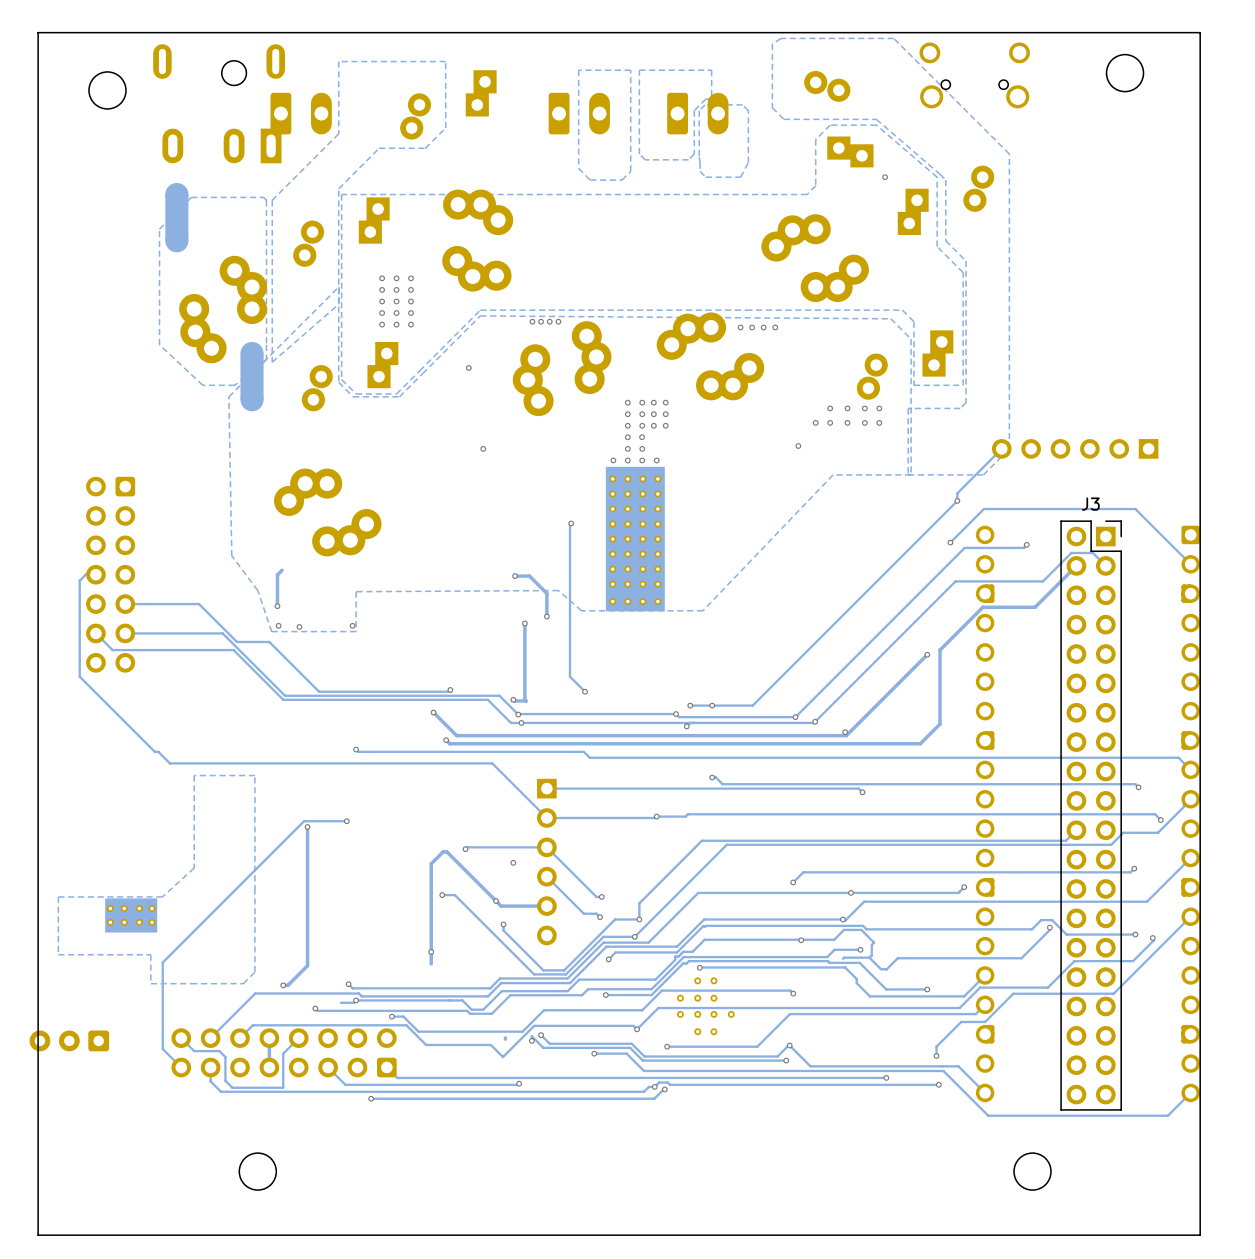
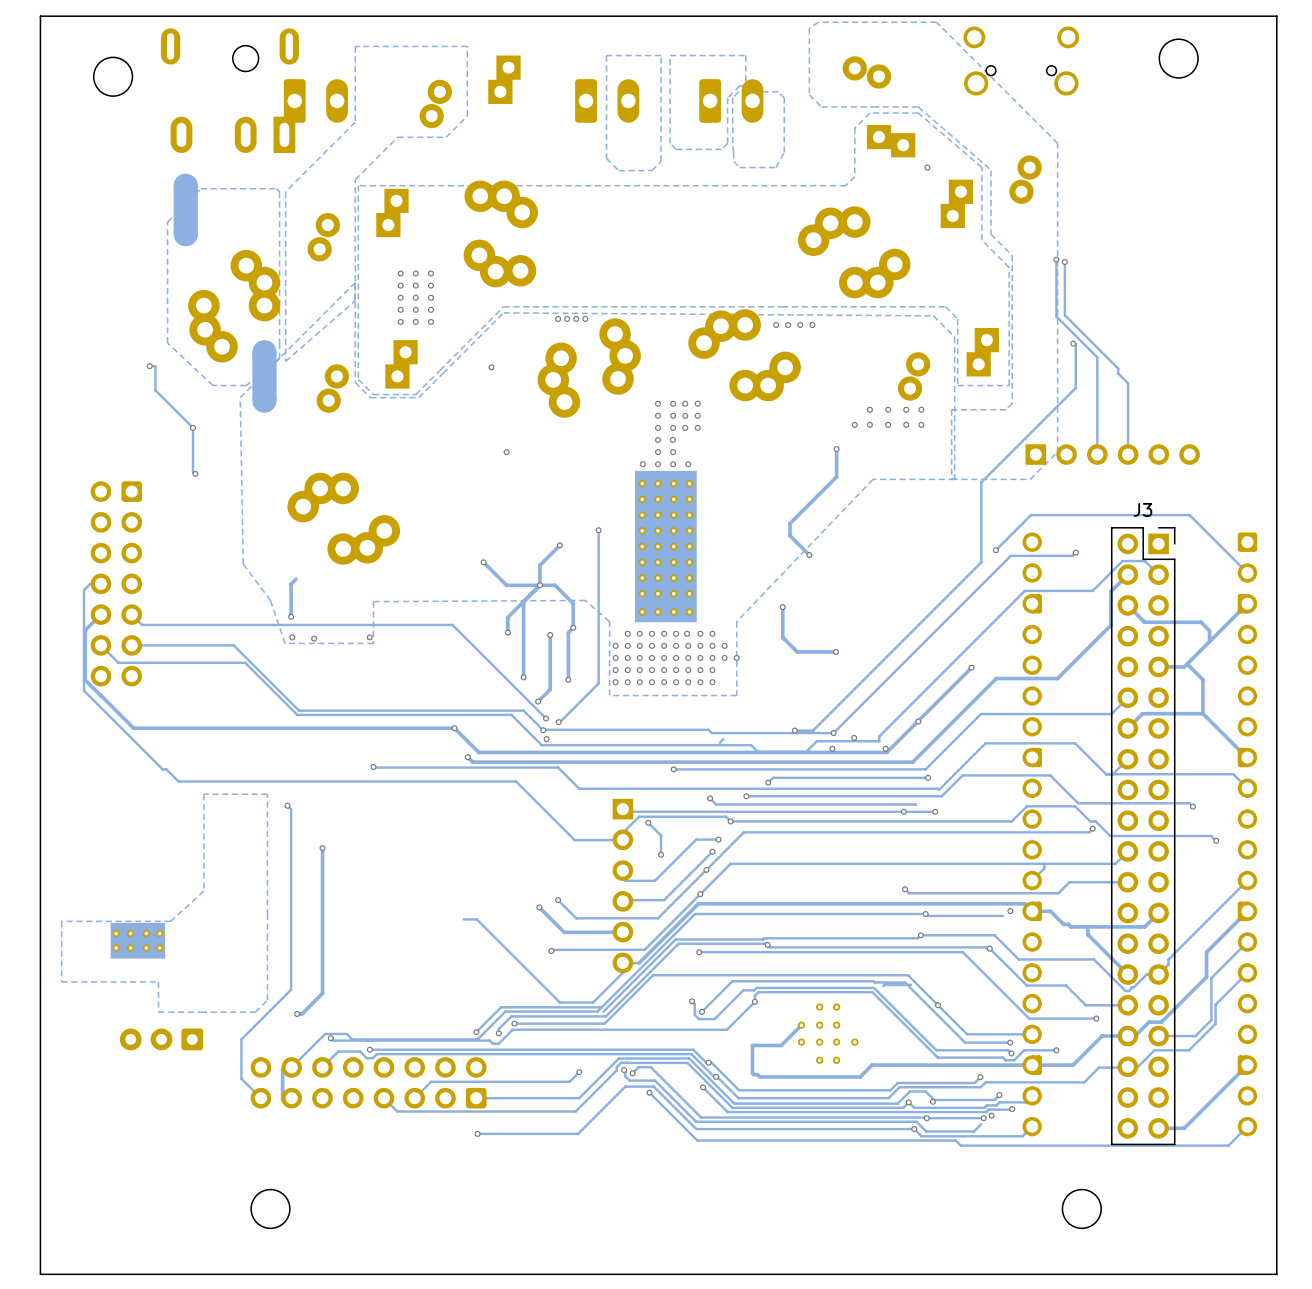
board edge: (1200, 32) (1200, 1235) (38, 1234) -> (1257, 16) (1276, 16) (1276, 1274) (40, 1274)
track: none -> (1056, 259) (1056, 316) (1097, 357) (1097, 454)
via: none -> (1056, 259)
track: none -> (1064, 262) (1064, 315) (1118, 368) (1118, 373) (1128, 383) (1128, 454)
via: none -> (1064, 262)
track: none -> (1073, 343) (1075, 344) (1075, 387) (981, 482) (981, 562) (813, 730) (794, 730)
via: none -> (1073, 343)
track: none -> (149, 366) (155, 366) (155, 390) (193, 427) (193, 471) (195, 473)
via: none -> (149, 366)
via: none -> (193, 427)
track: none -> (836, 449) (836, 476) (789, 523) (789, 535) (809, 555)
track: (1001, 448) (957, 493) (957, 500) (752, 705) (690, 705) -> none
part rotation: 0° (1075, 448) -> 180° (1112, 454)
via: none -> (195, 473)
via: (957, 500) -> none
track: (571, 523) (570, 676) (585, 691) -> (598, 530) (598, 683) (558, 722)
track: none -> (559, 545) (539, 565) (539, 585)
via: none -> (559, 545)
via: none -> (809, 555)
track: none -> (483, 562) (506, 585) (539, 585)
via: none -> (483, 562)
track: none -> (539, 585) (507, 617) (507, 632)
track: (978, 581) (955, 581) (813, 722) (511, 722) -> (1024, 590) (879, 736) (879, 741) (816, 741) (806, 751) (757, 751) (751, 745) (541, 745) (535, 739)
track: (1060, 582) (1035, 607) (982, 607) (940, 650) (940, 724) (920, 743) (449, 743) -> (1110, 591) (1110, 625) (1057, 678) (996, 678) (912, 762) (471, 760)
track: none -> (523, 601) (523, 677)
track: none -> (1247, 603) (1184, 666) (1158, 666)
track: none -> (1127, 605) (1144, 622) (1201, 622) (1209, 630) (1209, 641)
track: none -> (782, 607) (782, 637) (797, 651) (836, 651)
via: none -> (782, 607)
track: none -> (100, 614) (85, 630) (85, 680) (133, 728) (454, 728)
track: (125, 604) (199, 604) (236, 642) (269, 642) (319, 691) (450, 691) (450, 689) -> (131, 614) (142, 624) (452, 624) (545, 718)
zone outline: (702, 610) (581, 610) -> (736, 621) (736, 695) (609, 695) (609, 621)
track: none -> (573, 627) (568, 632) (568, 679)
via: none -> (507, 632)
via: none -> (627, 633)
via: none -> (639, 633)
via: none -> (651, 633)
via: none -> (664, 633)
via: none -> (676, 633)
via: none -> (687, 633)
via: none -> (700, 633)
via: none -> (712, 633)
via: none -> (615, 645)
via: none -> (627, 645)
via: none -> (639, 645)
via: none -> (651, 645)
via: none -> (664, 645)
via: none -> (676, 645)
via: none -> (688, 645)
via: none -> (700, 645)
via: none -> (712, 645)
via: none -> (724, 645)
via: none -> (836, 651)
via: none -> (615, 657)
via: none -> (627, 657)
via: none -> (639, 657)
via: none -> (651, 657)
via: none -> (664, 657)
via: none -> (676, 657)
via: none -> (688, 657)
via: none -> (700, 657)
via: none -> (712, 657)
via: none -> (724, 657)
via: none -> (736, 657)
track: none -> (1187, 664) (1202, 679) (1202, 713)
via: none -> (615, 670)
via: none -> (627, 670)
via: none -> (639, 670)
via: none -> (651, 670)
via: none -> (664, 670)
via: none -> (676, 670)
via: none -> (688, 670)
via: none -> (700, 670)
via: none -> (712, 670)
via: none -> (523, 677)
via: none -> (568, 679)
via: none -> (615, 682)
via: none -> (627, 682)
via: none -> (639, 682)
via: none -> (651, 682)
via: none -> (664, 682)
via: none -> (676, 682)
via: none -> (688, 682)
via: none -> (700, 682)
via: none -> (712, 682)
track: (524, 675) (526, 700) (513, 699) -> (550, 689) (538, 701)
track: none -> (1127, 697) (1111, 714) (980, 714) (925, 769) (673, 769)
via: none -> (538, 701)
via: (450, 689) -> none
via: (585, 691) -> none
track: none -> (1202, 713) (1247, 757)
track: none -> (1202, 713) (1142, 713) (1127, 728)
via: (513, 699) -> none
via: none -> (545, 718)
via: (690, 705) -> none
via: (712, 705) -> none
via: none -> (558, 722)
via: none -> (918, 721)
via: (676, 714) -> none
via: none -> (794, 730)
via: (686, 726) -> none
via: none -> (832, 748)
track: none -> (1127, 759) (1112, 774)
track: (356, 750) (358, 751) (583, 751) (589, 757) (1178, 757) -> (374, 767) (558, 767) (579, 788) (938, 789) (985, 743) (1075, 743) (1106, 774) (1234, 775)
via: none -> (673, 769)
track: none -> (928, 777) (773, 777) (768, 782)
via: none -> (928, 777)
via: none -> (768, 782)
track: (715, 777) (722, 784) (1029, 784) -> (750, 796) (941, 796) (962, 775) (1050, 775) (1078, 803)
track: none -> (710, 798) (716, 804) (915, 804)
via: none -> (710, 798)
track: none -> (287, 805) (291, 809) (291, 989) (241, 1039) (241, 1078) (260, 1098)
via: none -> (287, 805)
track: (546, 788) (858, 788) (862, 792) -> none
track: none -> (935, 811) (618, 811)
via: none -> (935, 811)
via: none -> (730, 821)
track: none -> (648, 822) (661, 835) (661, 854)
via: none -> (648, 822)
track: (1183, 802) (1183, 806) (1157, 832) (1123, 832) (1111, 844) (726, 844) (634, 936) (609, 936) -> (1139, 926) (1071, 926) (1068, 924) (1063, 924) (1050, 911) (1032, 911) (1024, 903) (698, 903) (639, 963)
track: none -> (1092, 828) (1089, 832) (743, 832) (658, 918) (576, 918) (558, 900)
via: none -> (1092, 828)
track: (1156, 815) (687, 814) (685, 816) (655, 817) (546, 817) -> (1211, 835) (1110, 835) (1095, 821) (1090, 821) (1075, 806) (1026, 806) (1011, 821) (730, 821) (725, 816) (638, 816) (615, 840) (573, 838)
via: (656, 816) -> none
track: none -> (718, 839) (696, 839) (654, 880) (625, 880) (615, 870)
via: none -> (718, 839)
track: (346, 821) (304, 821) (162, 962) (162, 1049) (181, 1067) -> none
via: (346, 821) -> none
track: none -> (712, 851) (664, 900) (617, 900)
via: none -> (712, 851)
via: none -> (661, 854)
track: (1065, 840) (701, 840) (639, 903) (639, 919) (615, 919) (564, 970) (543, 970) (503, 930) (503, 924) -> (1116, 862) (730, 863) (644, 949) (551, 951)
track: none -> (1044, 863) (1044, 868) (1032, 880)
via: none -> (706, 869)
track: (465, 849) (467, 847) (546, 847) (596, 896) (601, 896) -> none
via: (465, 849) -> none
track: none -> (1127, 882) (1069, 882) (1058, 893) (909, 893) (905, 889)
via: (513, 862) -> none
part position: (546, 862) -> (622, 886)
via: none -> (905, 889)
track: (1134, 868) (1130, 872) (803, 872) (793, 882) -> none
via: (1134, 868) -> none
via: none -> (700, 894)
via: none -> (558, 900)
track: (546, 876) (583, 913) (596, 913) (600, 917) -> none
via: (793, 882) -> none
track: none -> (539, 907) (564, 932) (615, 932)
via: none -> (539, 907)
track: (964, 887) (958, 892) (698, 892) (648, 942) (603, 942) (567, 978) (500, 978) (490, 988) (352, 988) (348, 984) -> none
track: none -> (1247, 911) (1206, 952) (1206, 977) (1161, 1022) (1149, 1022) (1135, 1036) (1102, 1036) (1073, 1065) (872, 1065) (860, 1076) (759, 1076) (753, 1074) (752, 1045) (781, 1045) (801, 1025)
track: none -> (1158, 913) (1144, 926) (1139, 926)
via: none -> (925, 914)
track: none -> (1003, 915) (695, 914) (635, 973)
via: (850, 892) -> none
via: (442, 895) -> none
via: (601, 896) -> none
via: (496, 901) -> none
track: (1146, 901) (864, 901) (845, 920) (704, 919) (677, 946) (606, 946) -> (1201, 926) (1168, 959) (1168, 964) (1158, 974) (1146, 974) (1129, 990) (1125, 990) (1093, 959) (1018, 959) (994, 935) (920, 935) (917, 938) (675, 939) (607, 1007)
track: none -> (1087, 926) (1087, 934) (1127, 974)
track: (546, 906) (501, 906) (446, 851) (443, 851) (431, 863) (431, 963) -> none
via: none -> (920, 935)
via: (600, 917) -> none
via: (639, 919) -> none
via: none -> (767, 944)
via: (842, 919) -> none
via: none -> (989, 948)
via: (503, 924) -> none
track: none -> (988, 949) (989, 948) (1000, 959)
track: none -> (988, 950) (985, 947) (770, 947) (766, 943) (678, 943) (605, 1016) (511, 1016) (498, 1029) (498, 1033)
via: none -> (551, 951)
via: none -> (699, 952)
track: (702, 926) (676, 952) (615, 952) (608, 959) -> (736, 952) (699, 952)
track: (705, 926) (863, 925) (866, 929) (1031, 929) (1041, 920) (1052, 920) (1066, 934) (1135, 934) -> (739, 952) (962, 952) (1029, 1018) (1096, 1018)
track: (1049, 927) (1049, 929) (1021, 958) (1017, 958) -> (1127, 1005) (1085, 1005) (1066, 985)
via: (1049, 927) -> none
via: (1135, 934) -> none
via: (634, 936) -> none
track: (1152, 938) (1153, 940) (1133, 961) (1074, 961) (1047, 987) (980, 987) (959, 1008) (658, 1008) (637, 1029) (633, 1025) (534, 1025) (503, 1057) (490, 1044) (426, 1044) (406, 1025) (252, 1025) (240, 1038) -> none
via: (1152, 938) -> none
via: (801, 940) -> none
track: none -> (1247, 972) (1215, 1004) (1215, 1023) (1188, 1050) (1154, 1050) (1138, 1066) (1098, 1067) (1084, 1082) (985, 1082) (980, 1087) (899, 1087) (888, 1098) (738, 1098) (691, 1054) (376, 1054) (372, 1058) (366, 1058) (360, 1051) (338, 1051) (322, 1067)
track: (860, 949) (834, 949) (827, 957) (683, 957) (651, 989) (588, 989) (582, 995) (510, 995) (491, 1013) (475, 1013) -> (1056, 1050) (1024, 1050) (1014, 1060) (1005, 1060) (1003, 1057) (937, 1057) (872, 992) (758, 992) (754, 995) (754, 1001) (727, 1029) (512, 1029) (498, 1043)
via: (860, 949) -> none
via: (431, 951) -> none
track: (1156, 951) (1113, 993) (1013, 993) (985, 1021) (961, 1021) (936, 1046) (936, 1055) -> (1211, 978) (1211, 1020) (1195, 1036) (1158, 1036)
track: (980, 958) (897, 958) (886, 969) (881, 969) (869, 957) (871, 955) (871, 944) (874, 942) (861, 929) (844, 929) (834, 939) (704, 939) (692, 951) (683, 951) (678, 956) (675, 956) (675, 959) (655, 979) (579, 979) -> (1026, 985) (1000, 959)
via: (608, 959) -> none
track: (699, 967) (845, 967) (856, 979) (856, 983) -> (692, 1001) (694, 1003) (694, 1014) (698, 1019) (714, 1019) (743, 990) (754, 990) (756, 987) (874, 987) (897, 1011)
via: (699, 967) -> none
via: none -> (692, 1001)
via: none -> (754, 1001)
track: (985, 975) (964, 996) (870, 996) -> (1011, 1053) (1008, 1050) (936, 1050) (911, 1025)
via: none -> (938, 1005)
track: none -> (601, 1007) (501, 1007) (476, 1032)
track: (501, 983) (487, 996) (361, 996) (358, 993) (255, 993) (210, 1038) -> (525, 1011) (505, 1011) (477, 1039) (352, 1039) (346, 1033) (325, 1033) (291, 1067)
track: (575, 983) (567, 991) (501, 991) (483, 1009) (471, 1009) (462, 1000) (356, 1000) (353, 1002) (341, 1002) -> none
track: none -> (702, 1011) (732, 981) (905, 982) (965, 1042) (1010, 1042)
via: none -> (702, 1011)
via: (348, 984) -> none
track: (927, 989) (886, 989) (859, 962) (688, 961) (683, 963) (651, 995) (605, 995) -> none
via: (927, 989) -> none
via: none -> (1096, 1018)
track: (793, 993) (790, 990) (661, 990) (642, 1010) (543, 1010) (522, 1031) (418, 1031) (403, 1016) (391, 1016) -> none
via: (793, 993) -> none
via: none -> (514, 1023)
via: (605, 995) -> none
via: (356, 1000) -> none
via: none -> (476, 1032)
via: none -> (498, 1033)
track: (985, 1004) (975, 1014) (789, 1014) (757, 1046) (667, 1046) -> (1032, 1034) (967, 1034) (908, 975) (653, 975) (604, 1023) (514, 1023)
part position: (705, 1006) -> (828, 1033)
via: none -> (1010, 1042)
via: (391, 1016) -> none
track: none -> (369, 1049) (693, 1049) (706, 1062) (711, 1062) (739, 1090) (890, 1090) (897, 1083) (974, 1083) (980, 1077)
via: none -> (369, 1049)
via: none -> (1056, 1050)
via: none -> (1011, 1053)
via: (637, 1029) -> none
track: none -> (627, 1062) (621, 1062) (616, 1067) (616, 1070) (575, 1111) (397, 1111) (383, 1098)
via: none -> (708, 1062)
track: none -> (627, 1062) (687, 1062) (732, 1107) (903, 1107) (908, 1102) (914, 1107) (984, 1107) (986, 1105) (996, 1105) (999, 1102) (1025, 1102) (1032, 1095)
track: none -> (1247, 1065) (1184, 1128) (1158, 1128)
track: (541, 1035) (549, 1043) (631, 1043) (644, 1056) (777, 1056) (789, 1044) (810, 1066) (958, 1066) (985, 1092) -> (477, 1133) (578, 1133) (625, 1086) (653, 1086) (696, 1129) (914, 1129) (921, 1136) (1022, 1136) (1032, 1126)
via: (541, 1035) -> none
track: (298, 1038) (283, 1053) (283, 1087) (232, 1087) (225, 1080) (225, 1057) (219, 1051) (194, 1051) (181, 1038) -> none
track: (505, 1038) (505, 1039) -> none
track: none -> (624, 1070) (625, 1076) (629, 1080) (655, 1080) (696, 1121) (916, 1121) (926, 1131) (974, 1131) (981, 1124)
via: none -> (624, 1070)
part position: (69, 1040) -> (161, 1039)
track: (531, 1040) (531, 1036) (543, 1047) (630, 1047) (642, 1060) (786, 1060) -> none
via: (531, 1040) -> none
track: none -> (579, 1072) (569, 1081) (431, 1081) (414, 1098)
via: none -> (579, 1072)
via: none -> (632, 1073)
via: none -> (716, 1076)
via: (789, 1045) -> none
via: none -> (980, 1077)
via: (667, 1046) -> none
part position: (284, 1052) -> (368, 1082)
track: (594, 1053) (626, 1053) (644, 1070) (700, 1070) -> (476, 1098) (579, 1098) (618, 1058) (689, 1058) (734, 1103)
via: (594, 1053) -> none
track: none -> (703, 1087) (727, 1112) (986, 1112) (988, 1109) (1012, 1109)
via: none -> (703, 1087)
via: (936, 1055) -> none
track: none -> (649, 1092) (697, 1140) (955, 1140) (960, 1145) (1228, 1145)
via: none -> (649, 1092)
via: (786, 1060) -> none
via: none -> (999, 1095)
track: (210, 1067) (210, 1081) (221, 1091) (644, 1091) (648, 1086) (654, 1086) (659, 1082) (667, 1082) (670, 1084) (884, 1084) -> (632, 1073) (638, 1067) (650, 1067) (701, 1117) (926, 1118)
track: (328, 1067) (345, 1084) (519, 1083) -> none
track: (386, 1067) (397, 1077) (886, 1077) -> none
via: none -> (908, 1102)
via: none -> (932, 1101)
track: (856, 1070) (943, 1070) (988, 1115) (1167, 1115) (1172, 1111) -> (897, 1103) (909, 1091) (925, 1091) (934, 1099) (994, 1099) (999, 1095)
via: none -> (1012, 1109)
via: (886, 1077) -> none
via: none -> (991, 1115)
via: (519, 1083) -> none
via: none -> (926, 1118)
via: (654, 1086) -> none
track: (664, 1089) (654, 1098) (371, 1098) -> none
via: (664, 1089) -> none
via: none -> (914, 1129)
via: (371, 1098) -> none
via: none -> (477, 1133)

